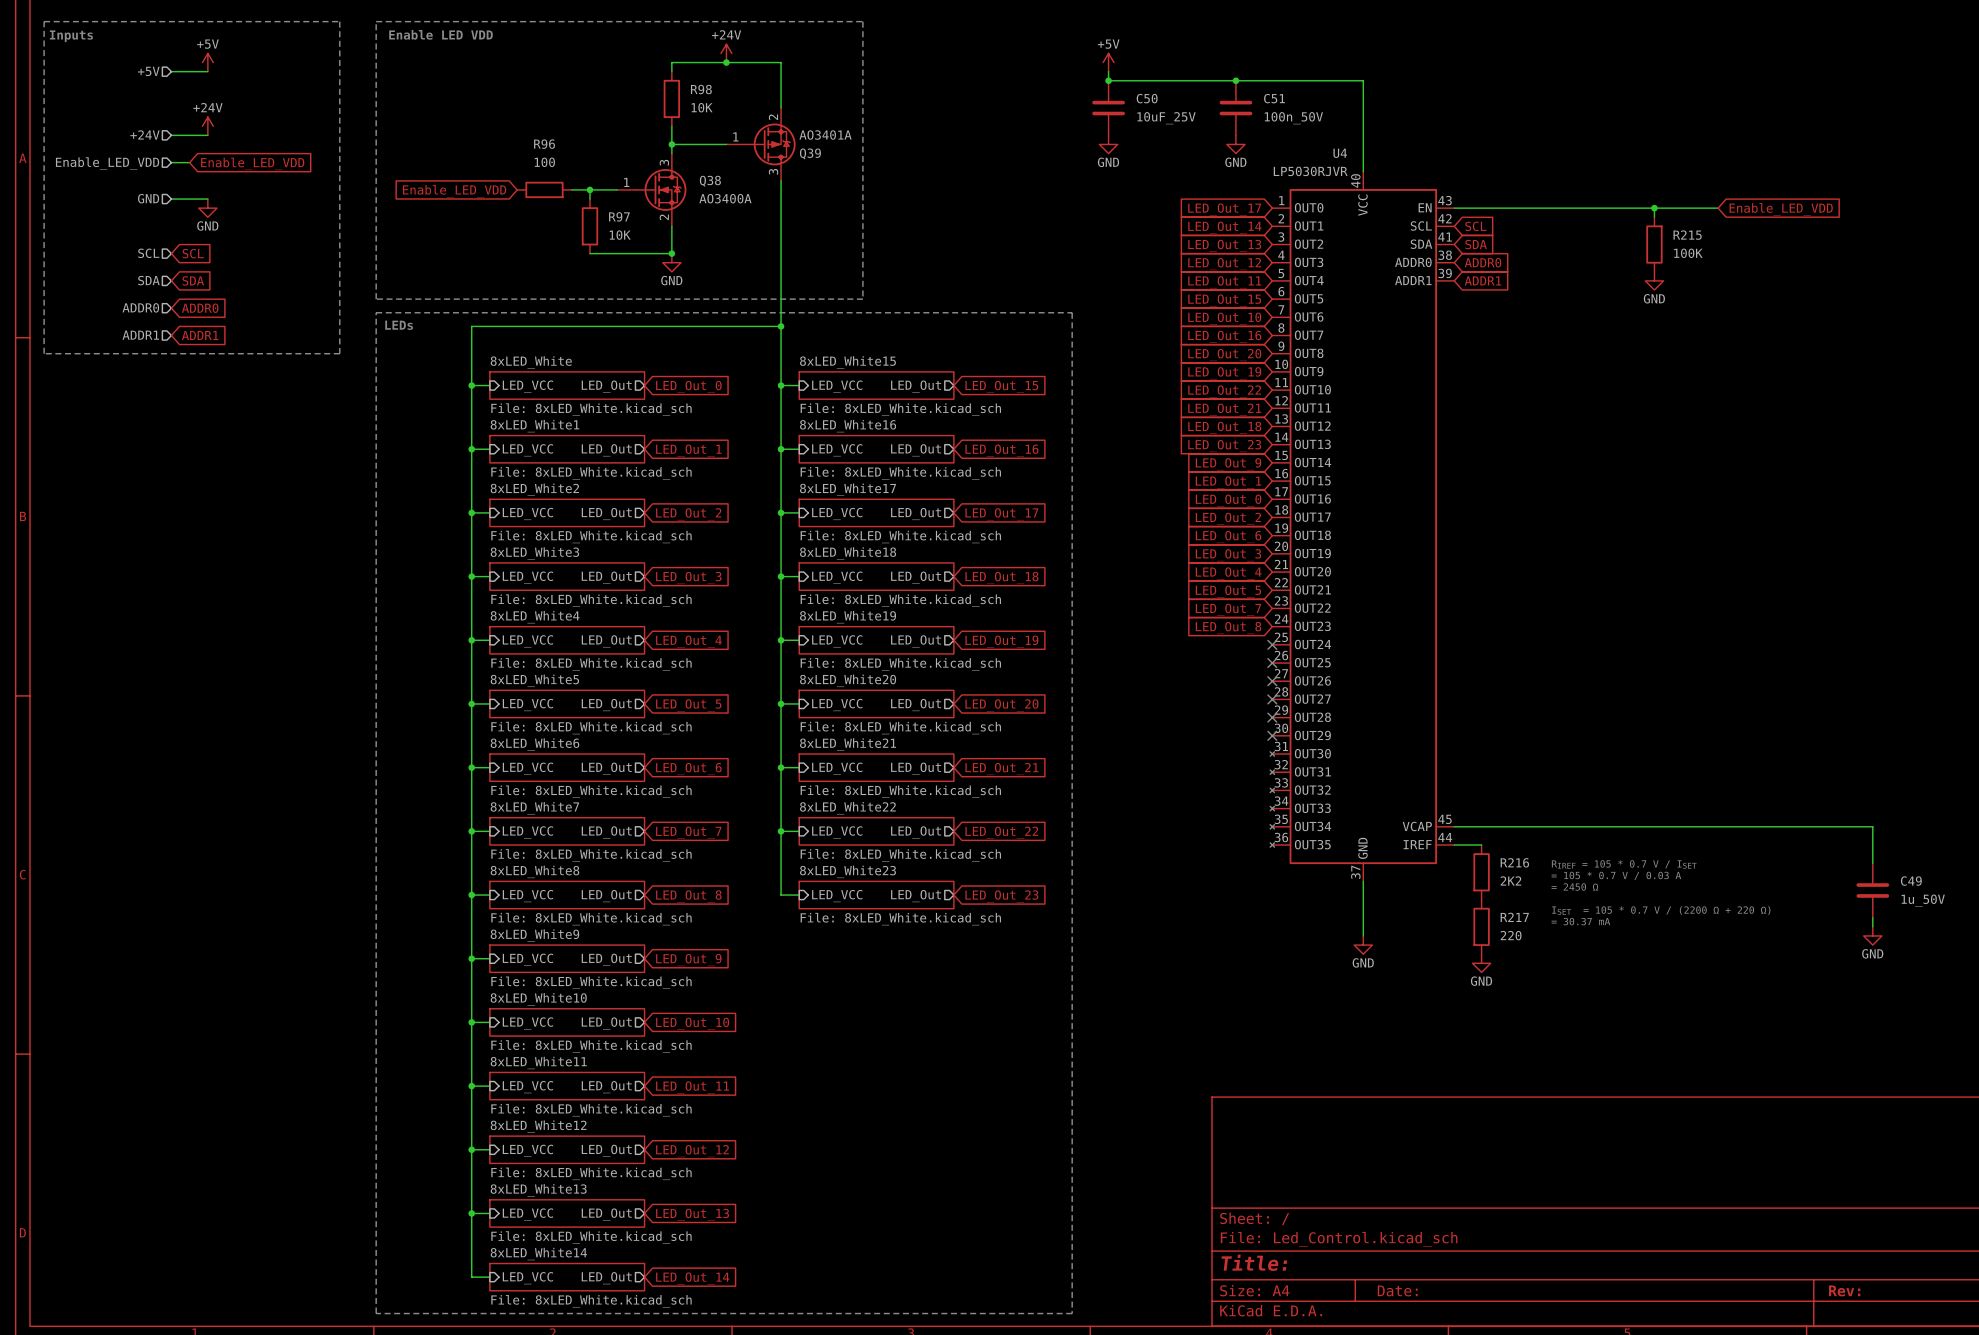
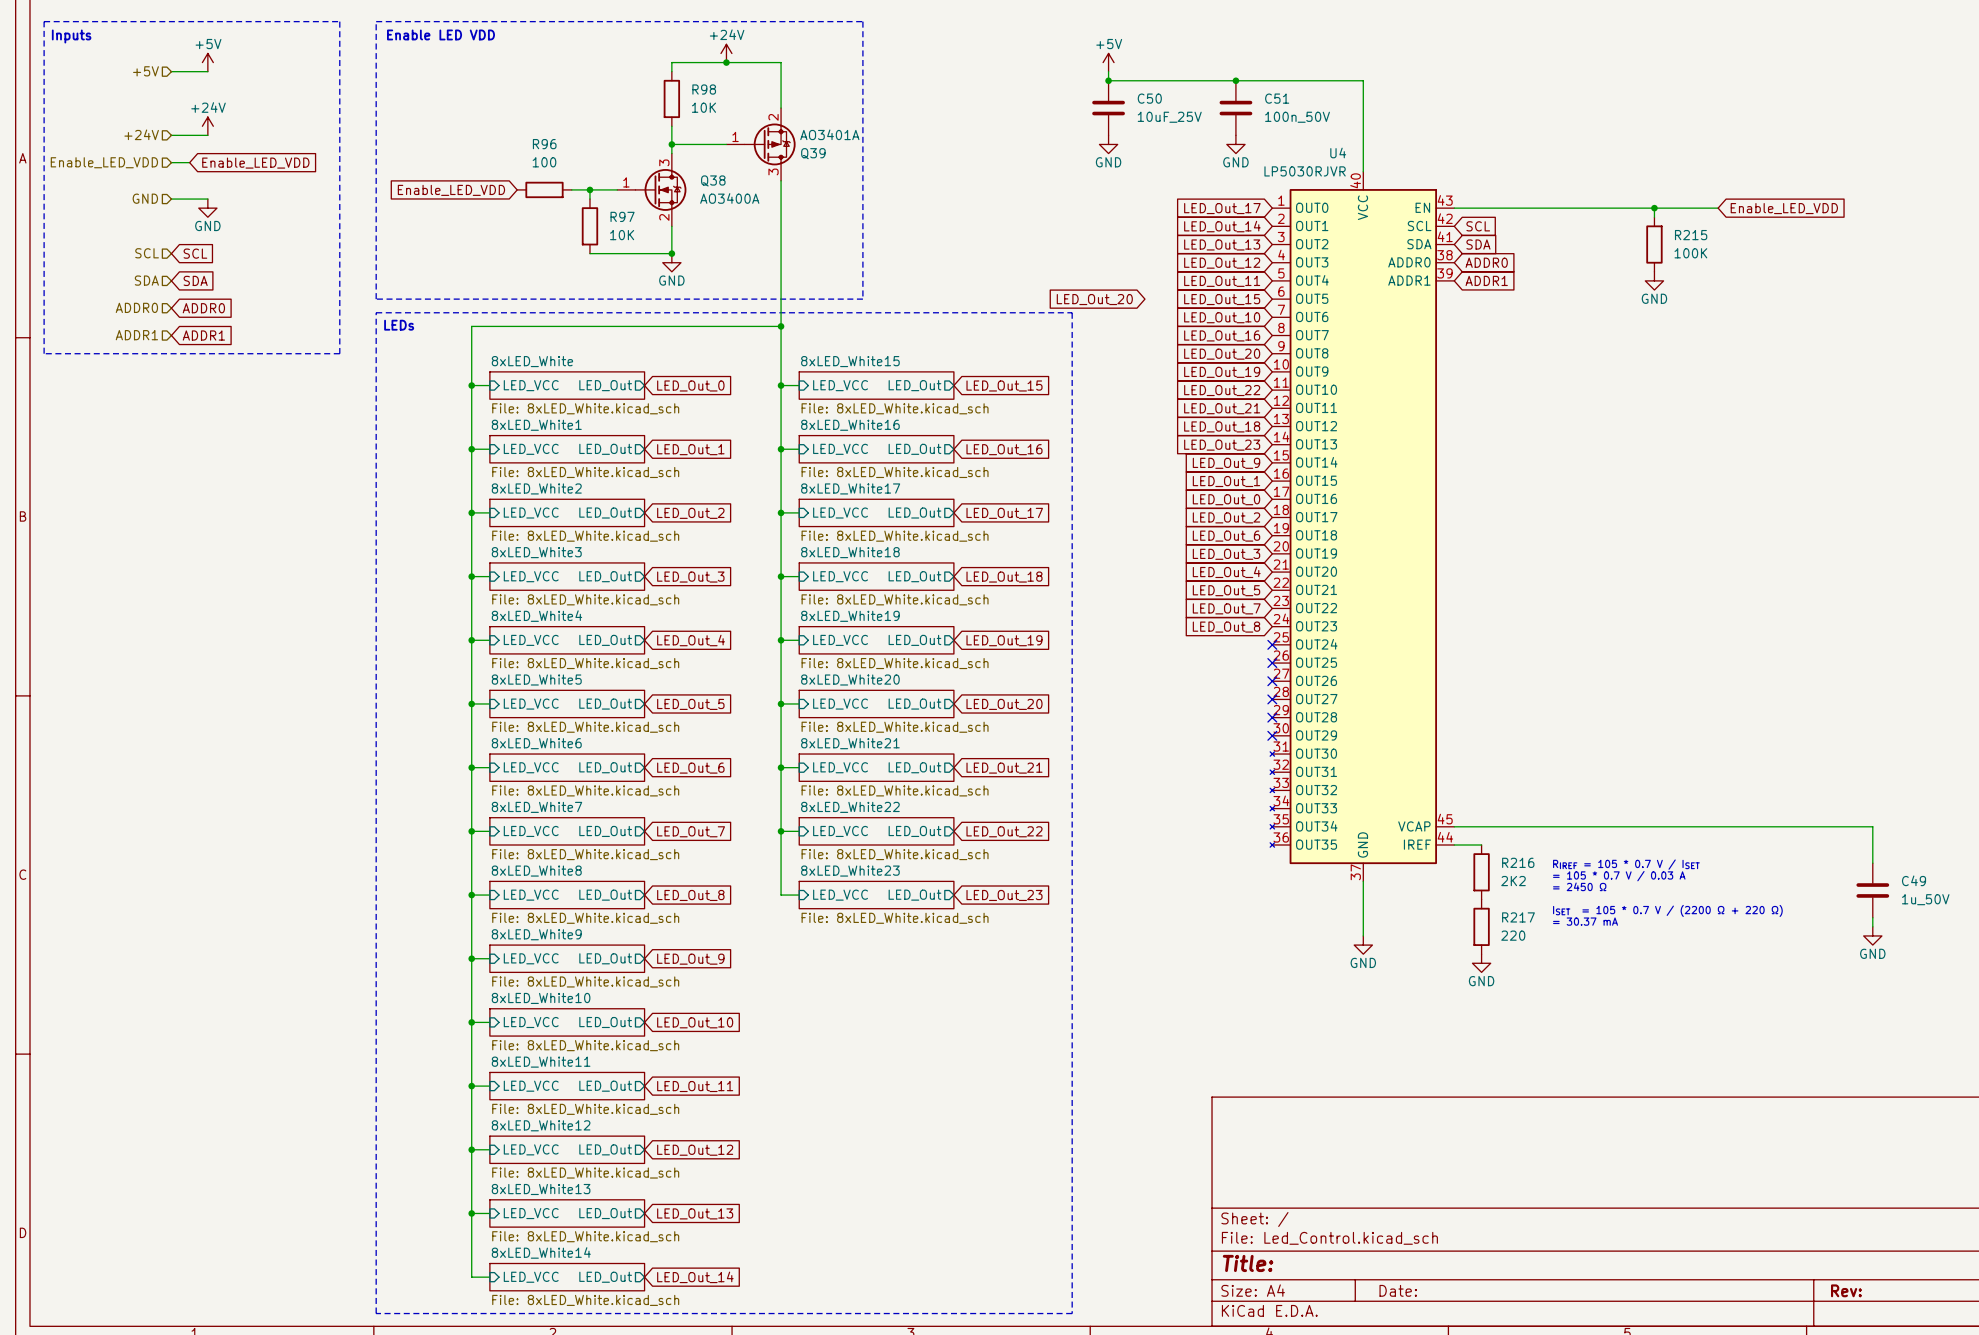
global label: none -> LED_Out_20 (1094, 299)

